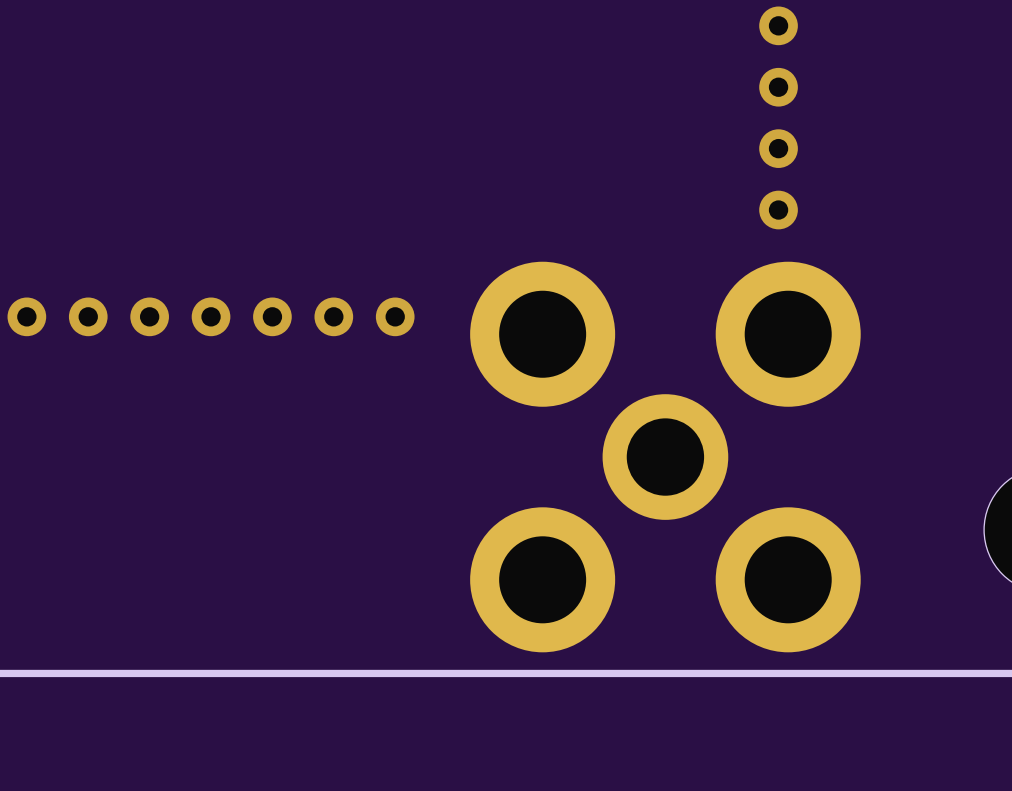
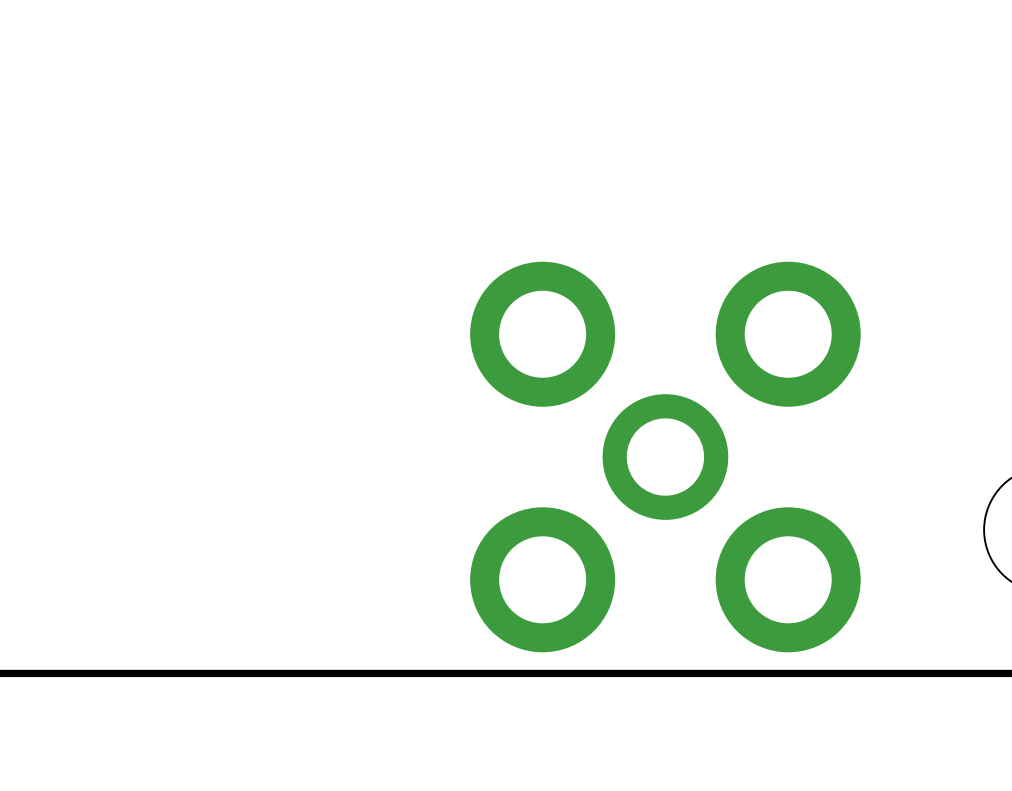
via: (778, 25) -> none
via: (778, 87) -> none
via: (778, 148) -> none
via: (778, 210) -> none
via: (26, 316) -> none
via: (88, 316) -> none
via: (149, 316) -> none
via: (211, 316) -> none
via: (272, 316) -> none
via: (333, 316) -> none
via: (395, 316) -> none

